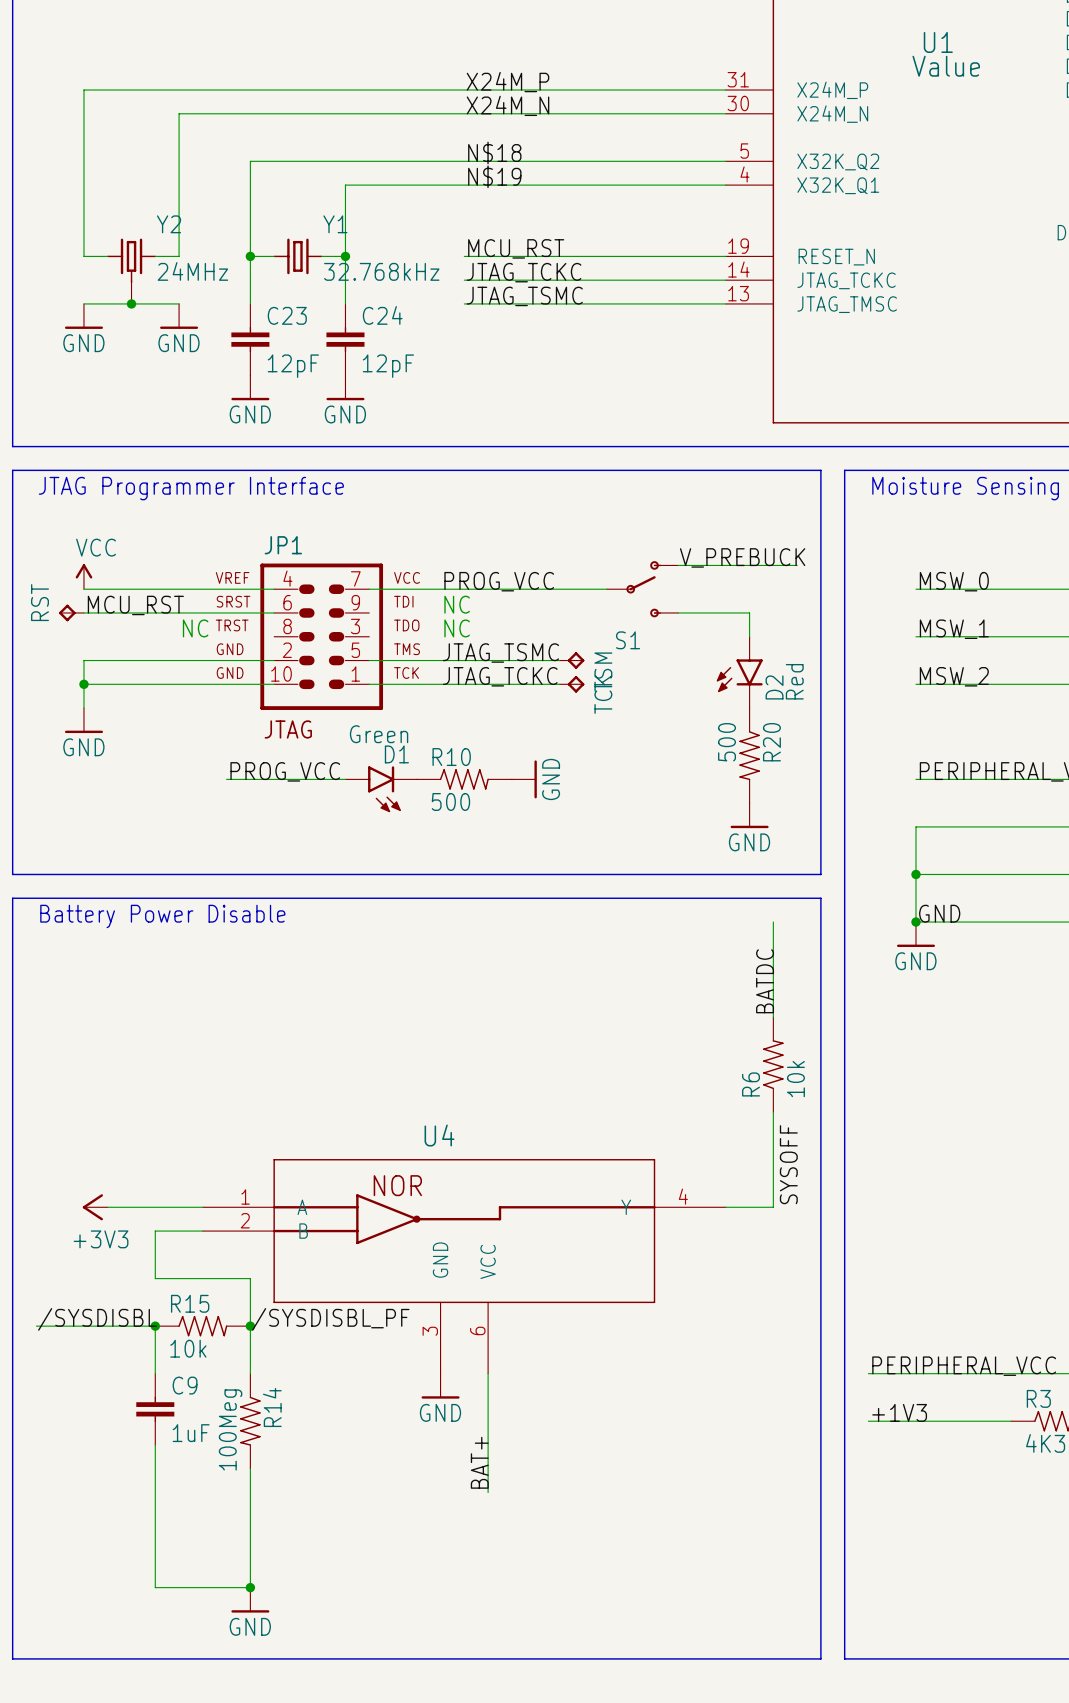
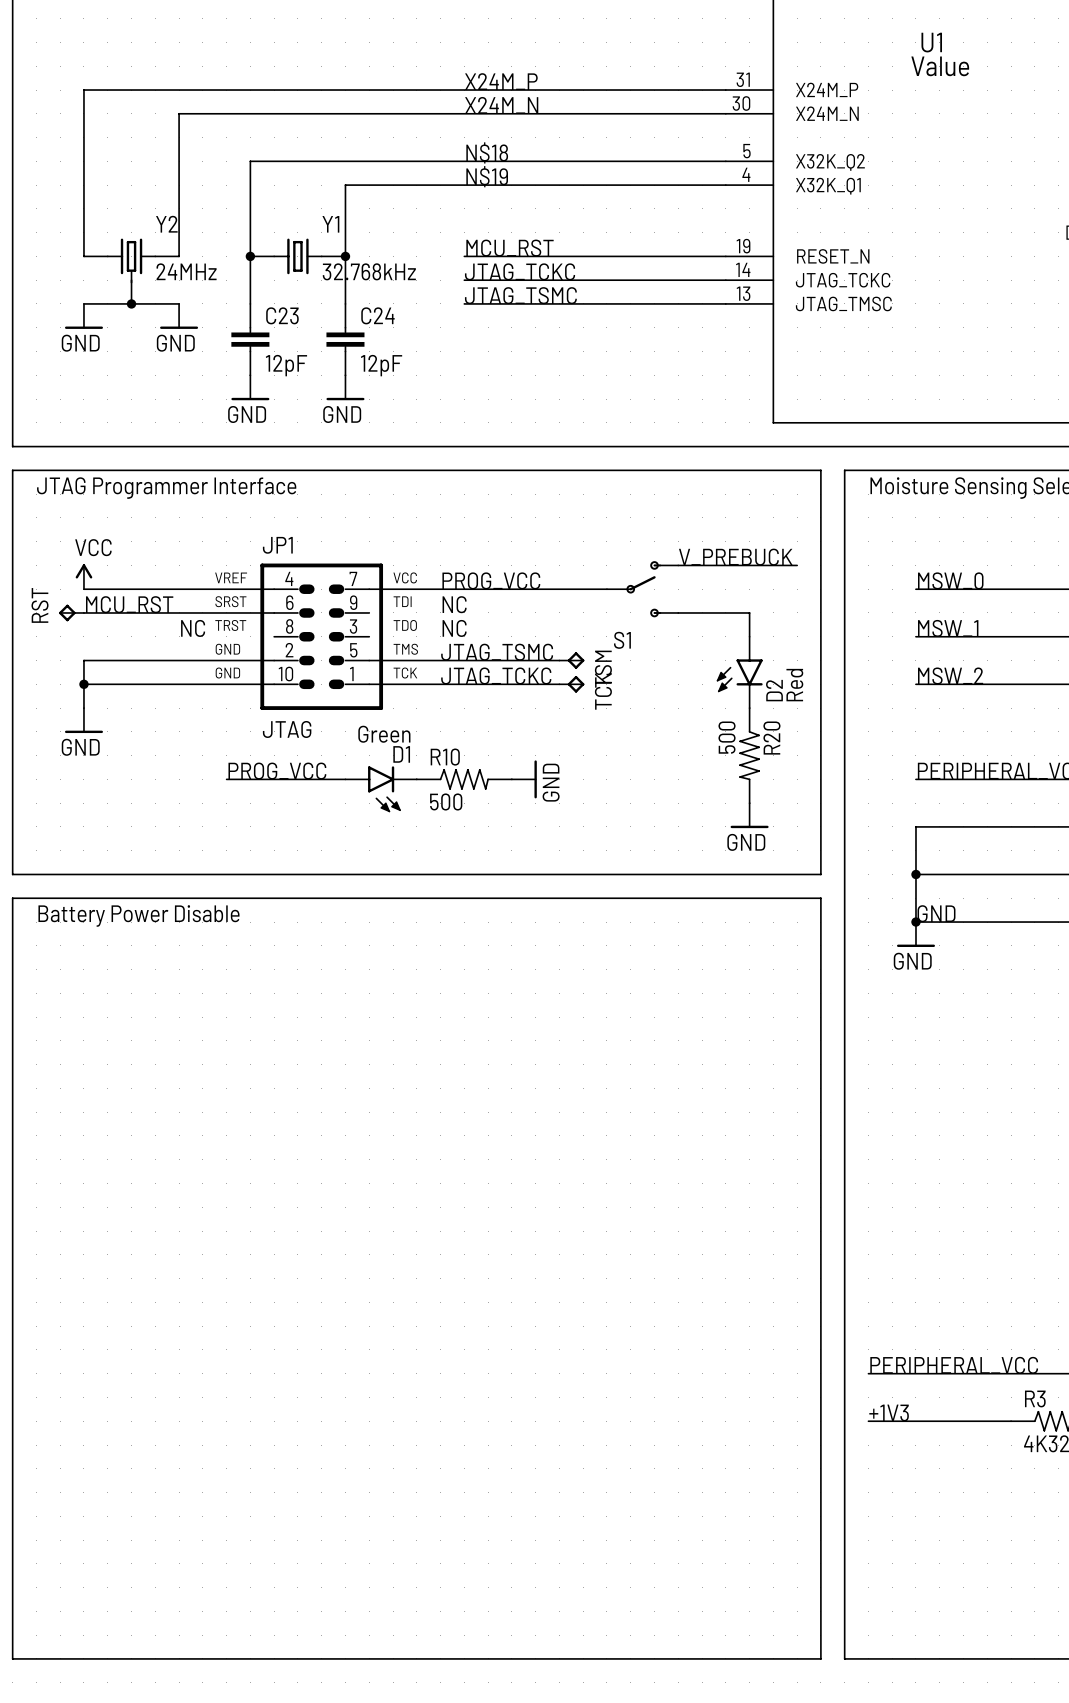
wire: (773, 922) (773, 1017) -> none
label: BATDC (765, 981) -> none
R6: 10k (773, 1064) -> none
wire: (773, 1112) (773, 1207) (725, 1207) -> none
label: SYSOFF (788, 1164) -> none
power symbol: +3V3 (95, 1207) -> none
wire: (107, 1207) (202, 1207) -> none
wire: (202, 1231) (155, 1231) (155, 1278) (250, 1278) (250, 1373) -> none
U4: (464, 1266) -> none
label: /SYSDISBL (97, 1319) -> none
label: /SYSDISBL_PF (330, 1319) -> none
wire: (36, 1326) (155, 1326) (155, 1373) -> none
junction: (155, 1326) -> none
R15: 10k (202, 1326) -> none
junction: (250, 1326) -> none
wire: (488, 1373) (488, 1492) -> none
power symbol: GND (440, 1386) -> none
C9: 1uF (155, 1409) -> none
R14: 100Meg (250, 1421) -> none
wire: (155, 1445) (155, 1587) (250, 1587) (250, 1468) -> none
label: BAT+ (479, 1462) -> none
junction: (250, 1587) -> none
power symbol: GND (250, 1600) -> none

